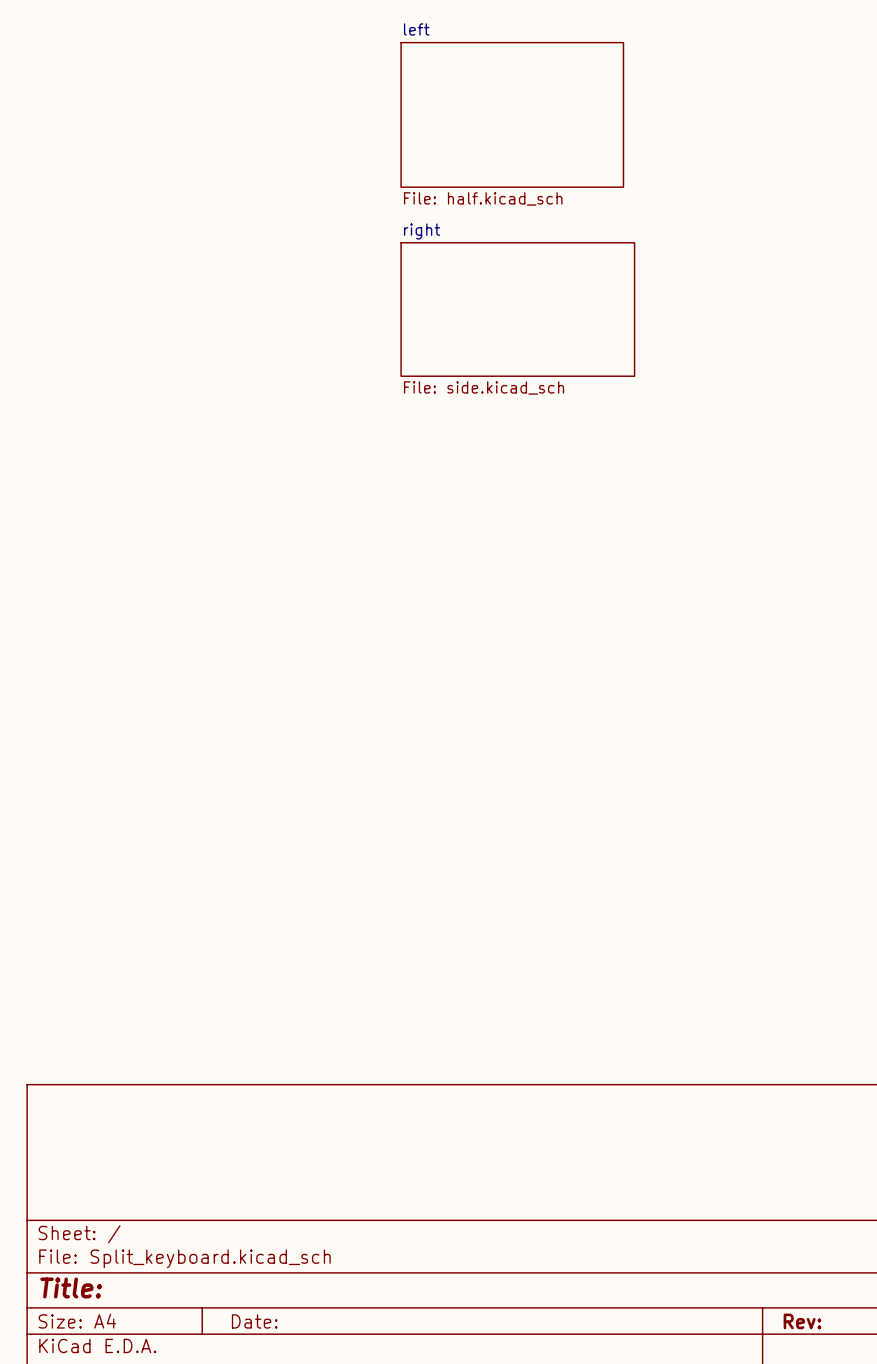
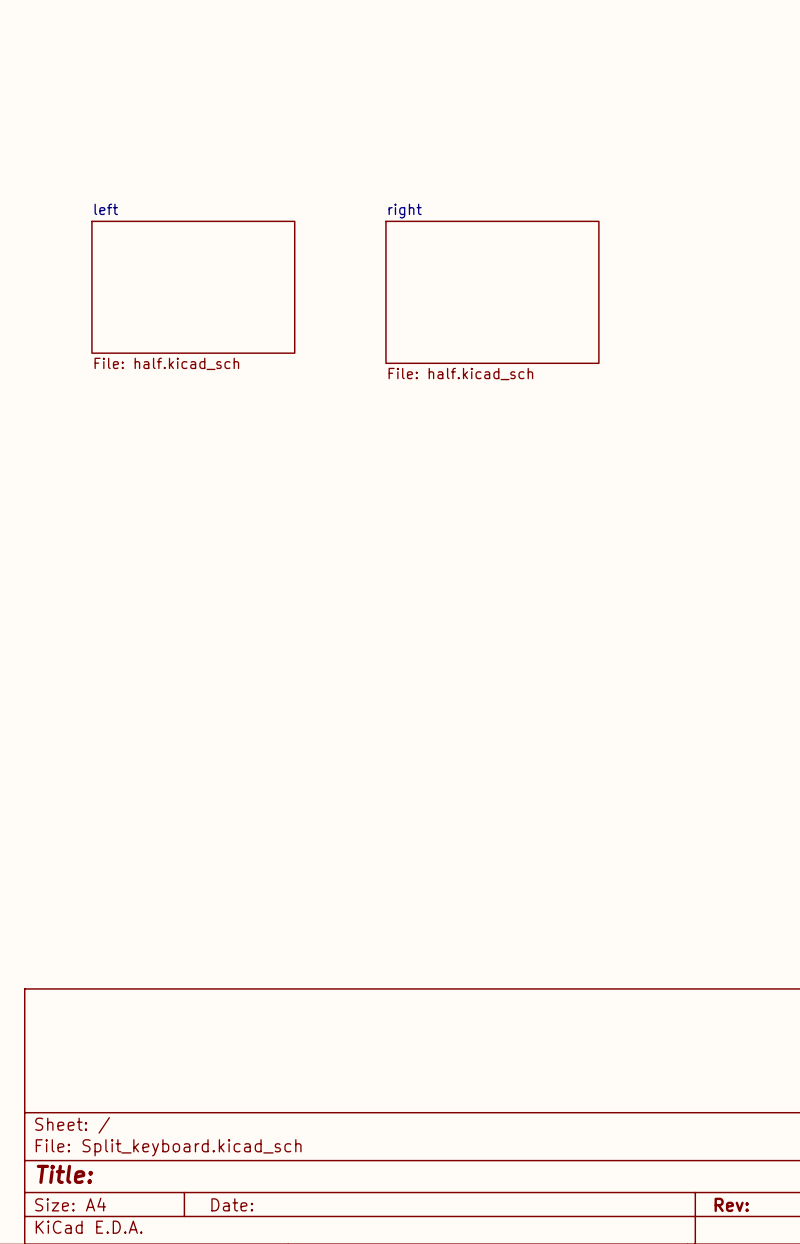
sheet left: File: half.kicad_sch (512, 114) -> none
sheet right: File: side.kicad_sch (517, 309) -> none
sheet left: none -> File: half.kicad_sch (193, 287)
sheet right: none -> File: half.kicad_sch (492, 292)

